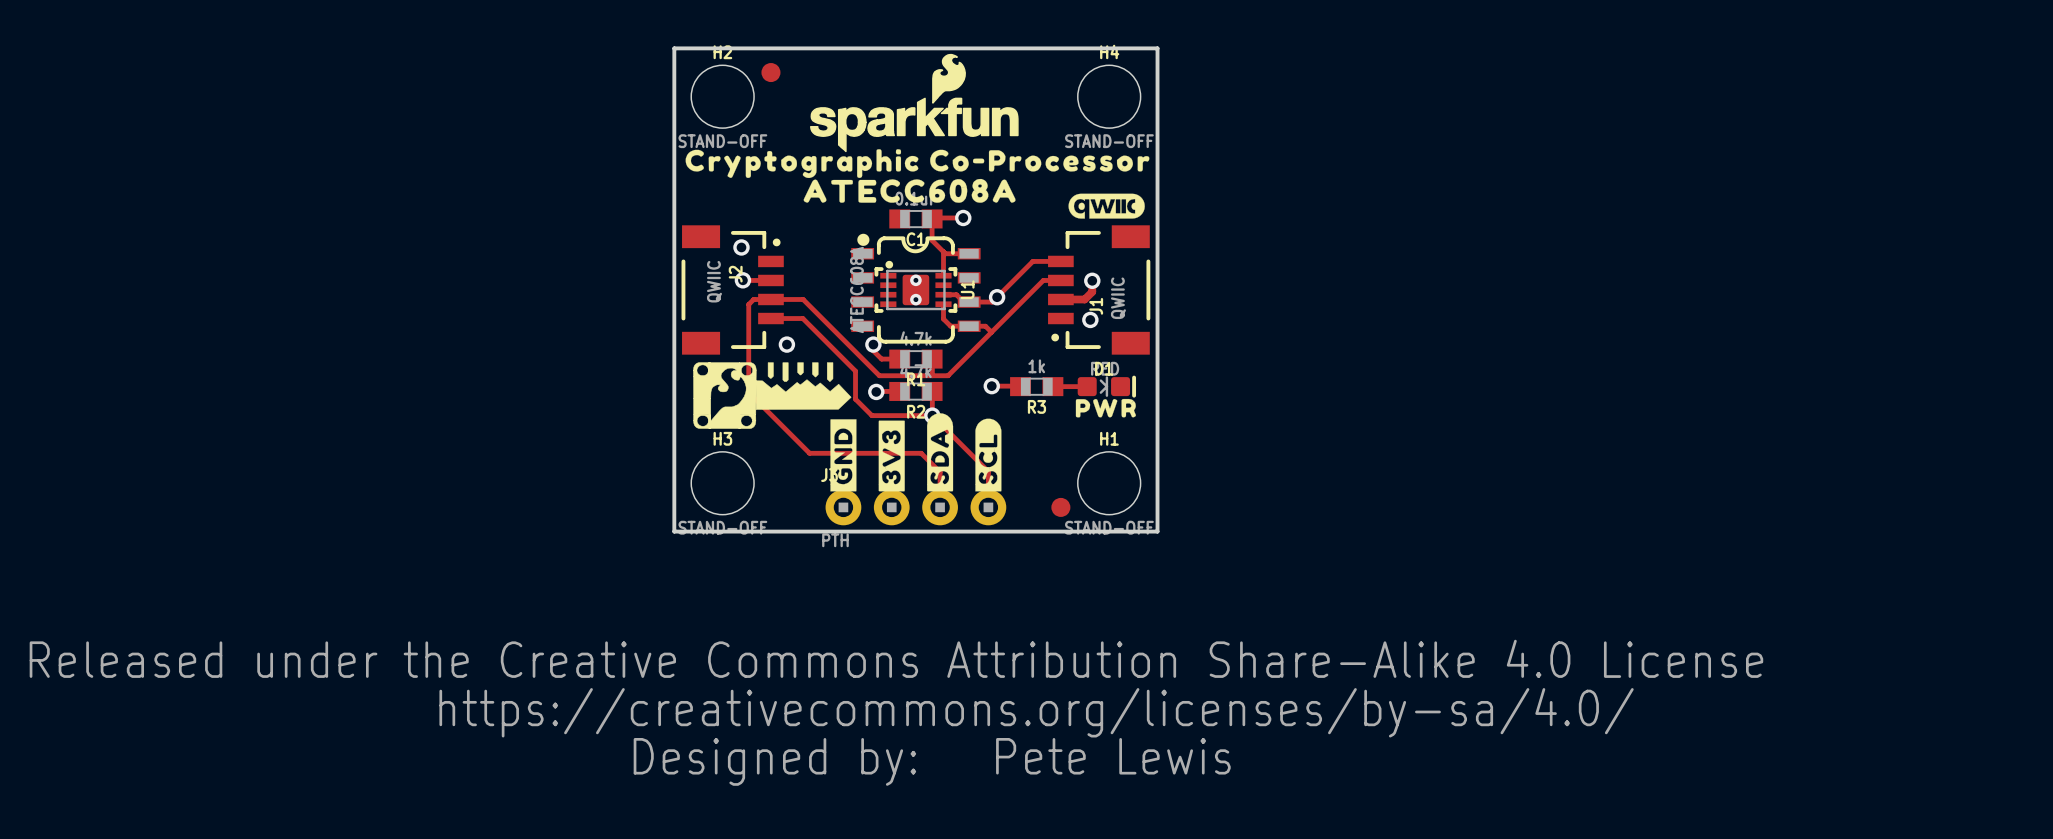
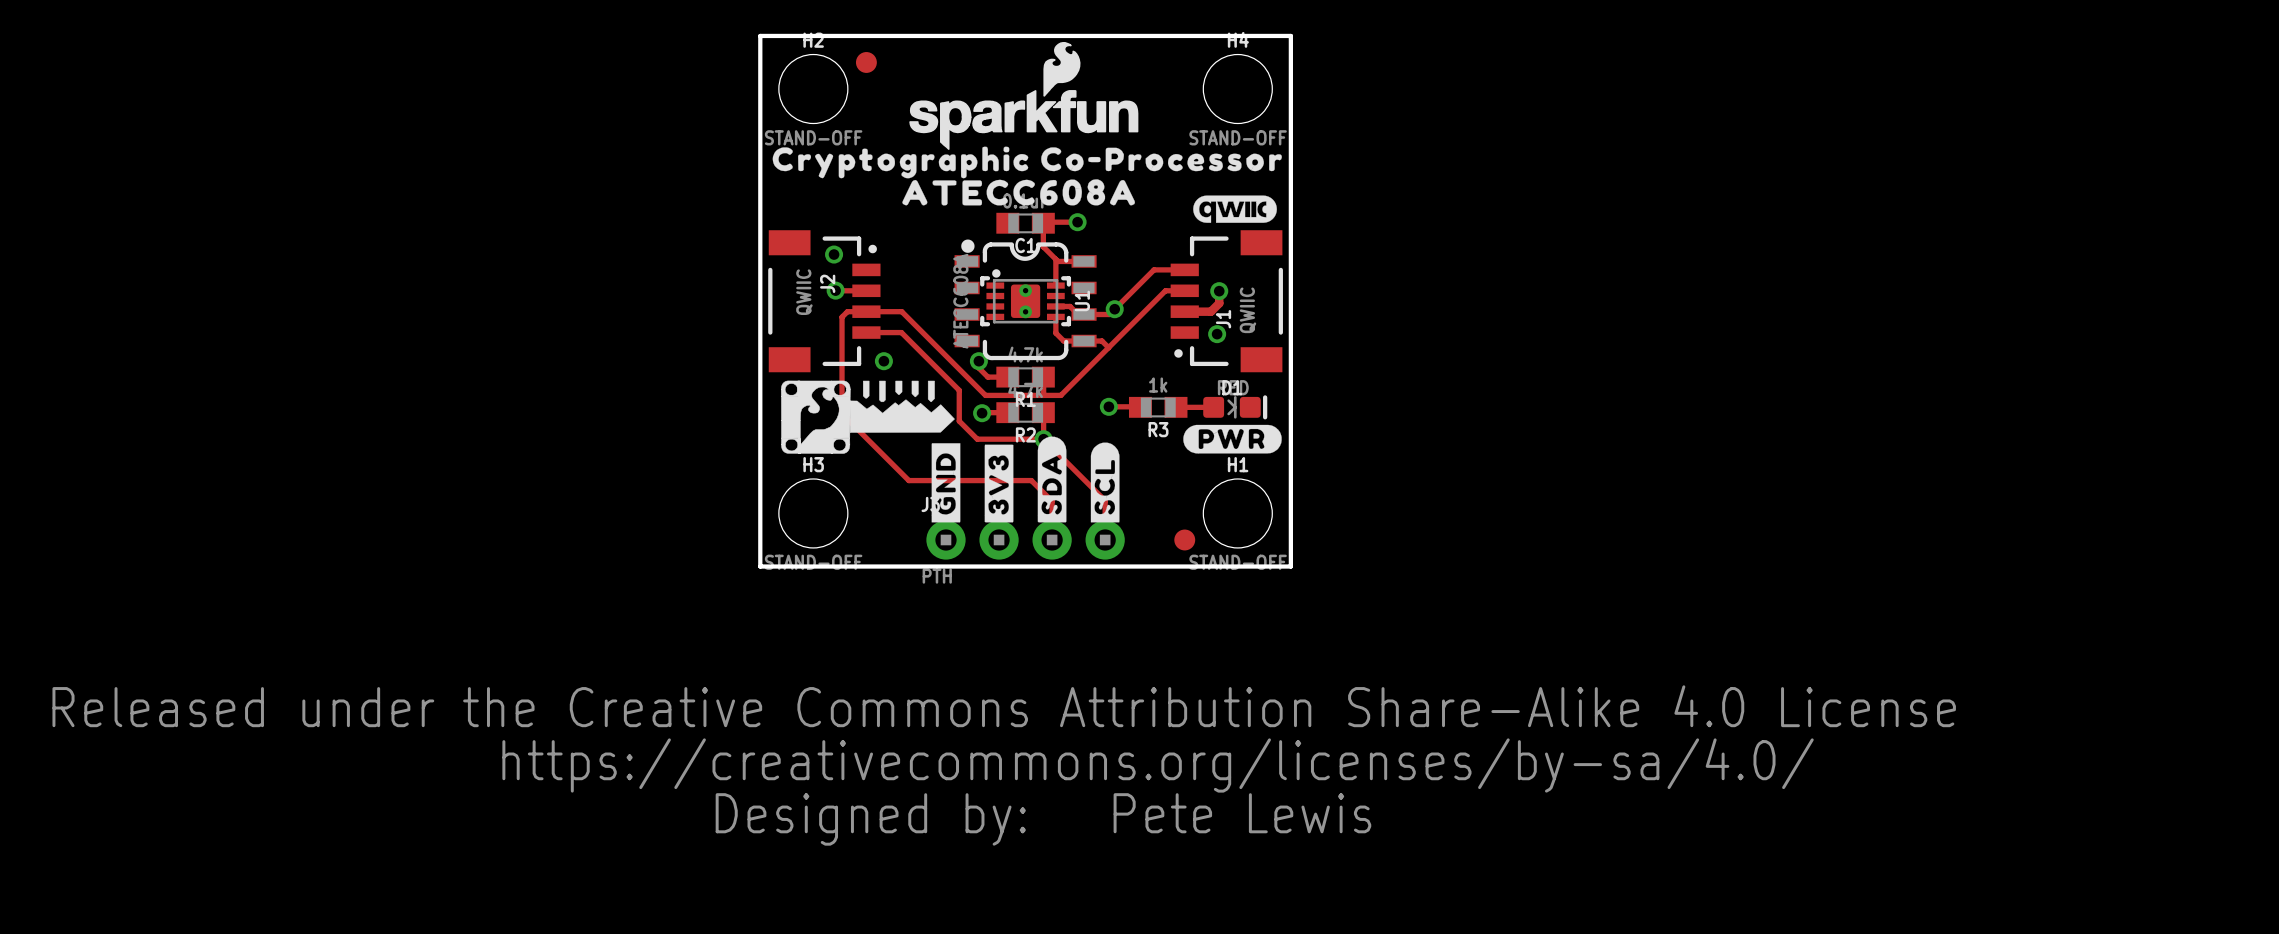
drawing shape: [1075, 398, 1136, 418] -> [1183, 424, 1282, 454]

